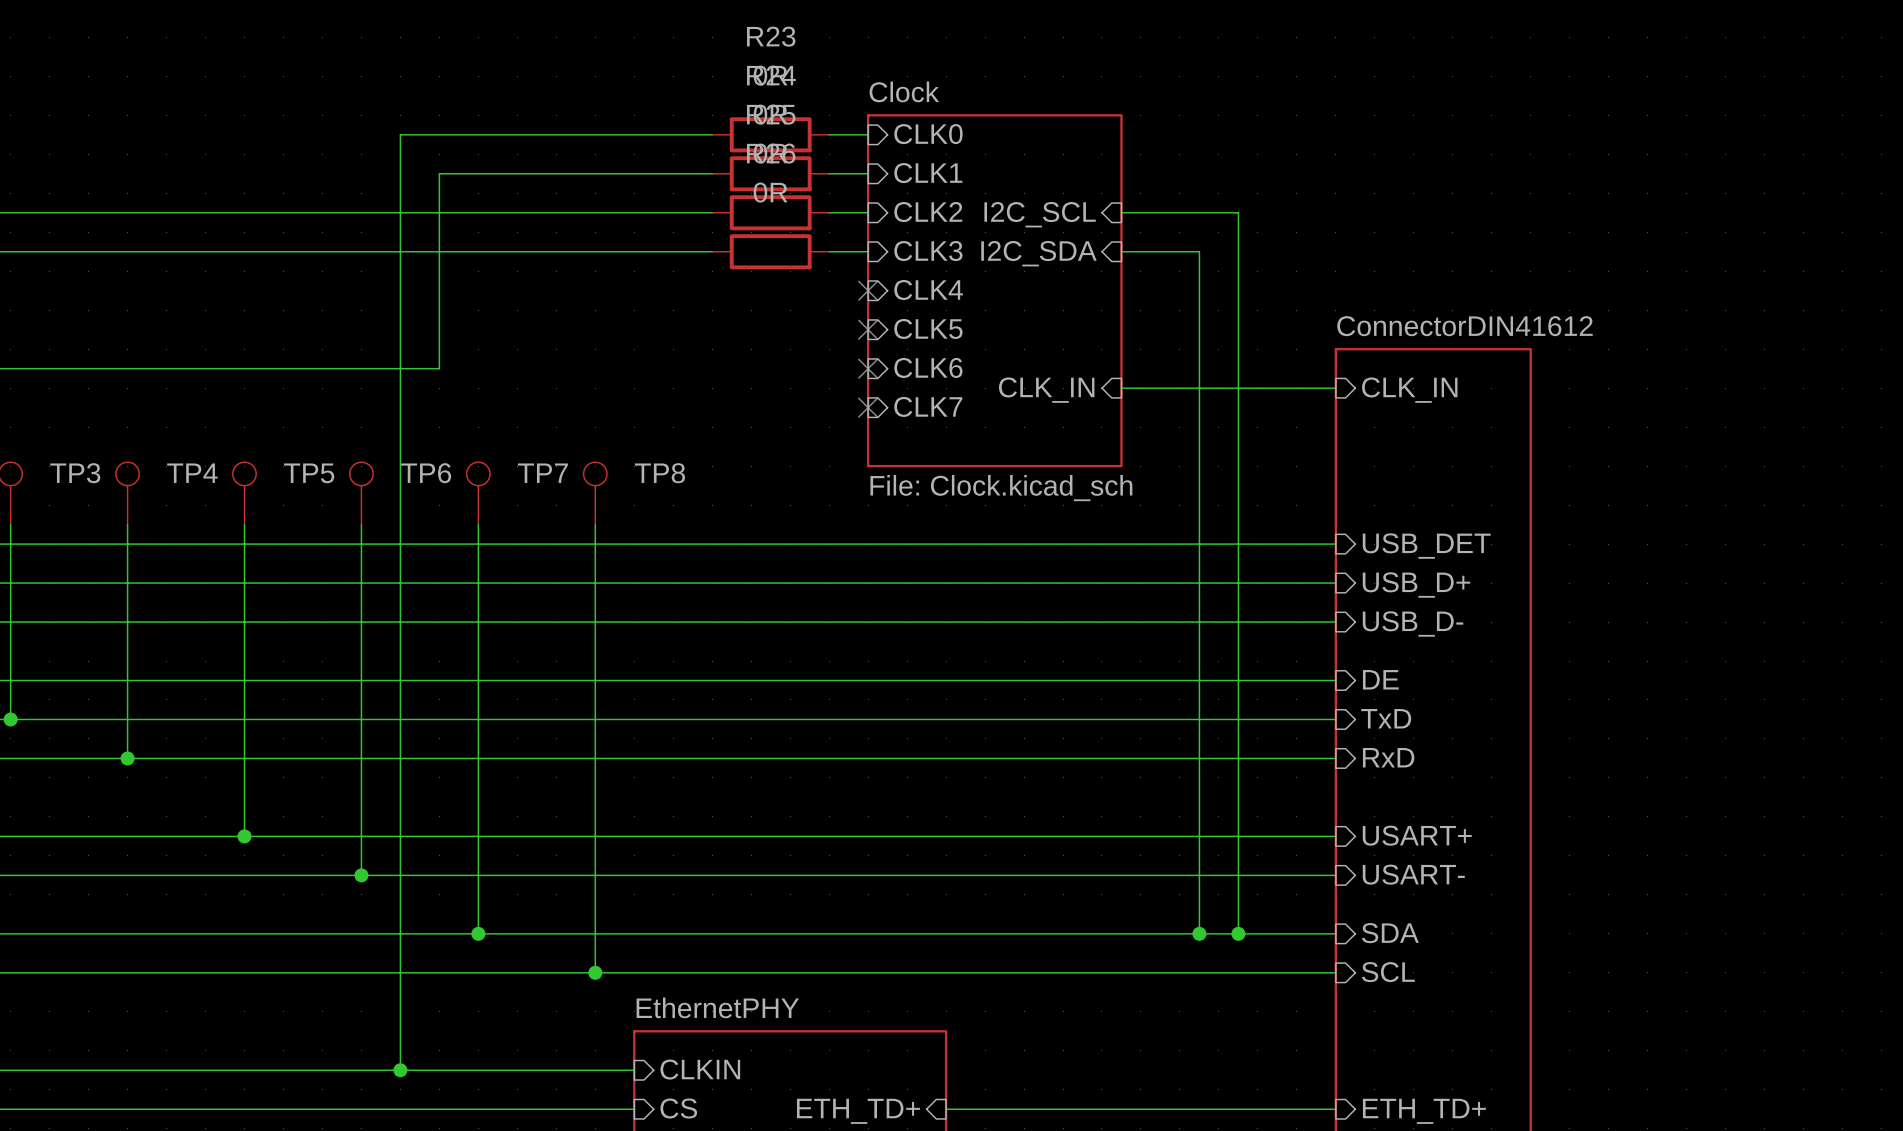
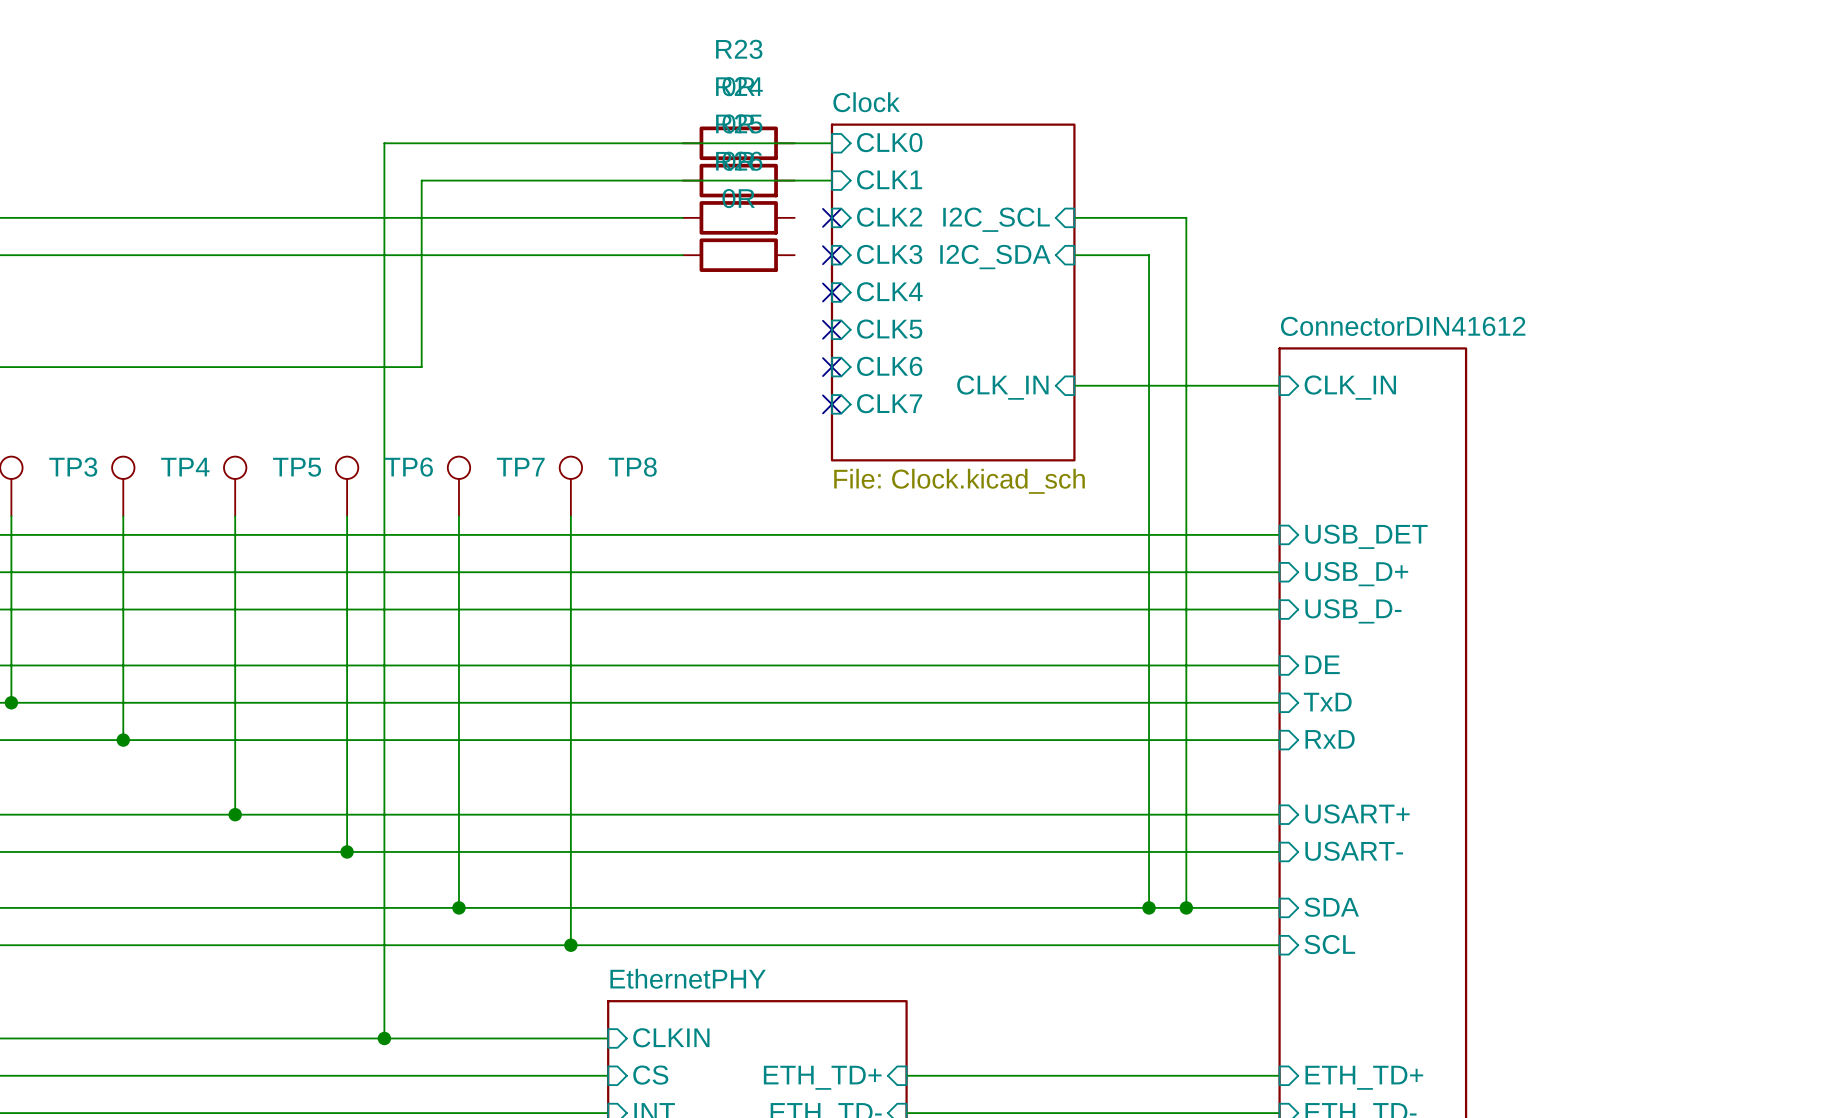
wire: none -> (682, 143) (794, 143)
wire: none -> (682, 180) (794, 180)
wire: (829, 212) (868, 212) -> none
no-connect mark: none -> (831, 217)
wire: (829, 251) (868, 251) -> none
no-connect mark: none -> (831, 255)

